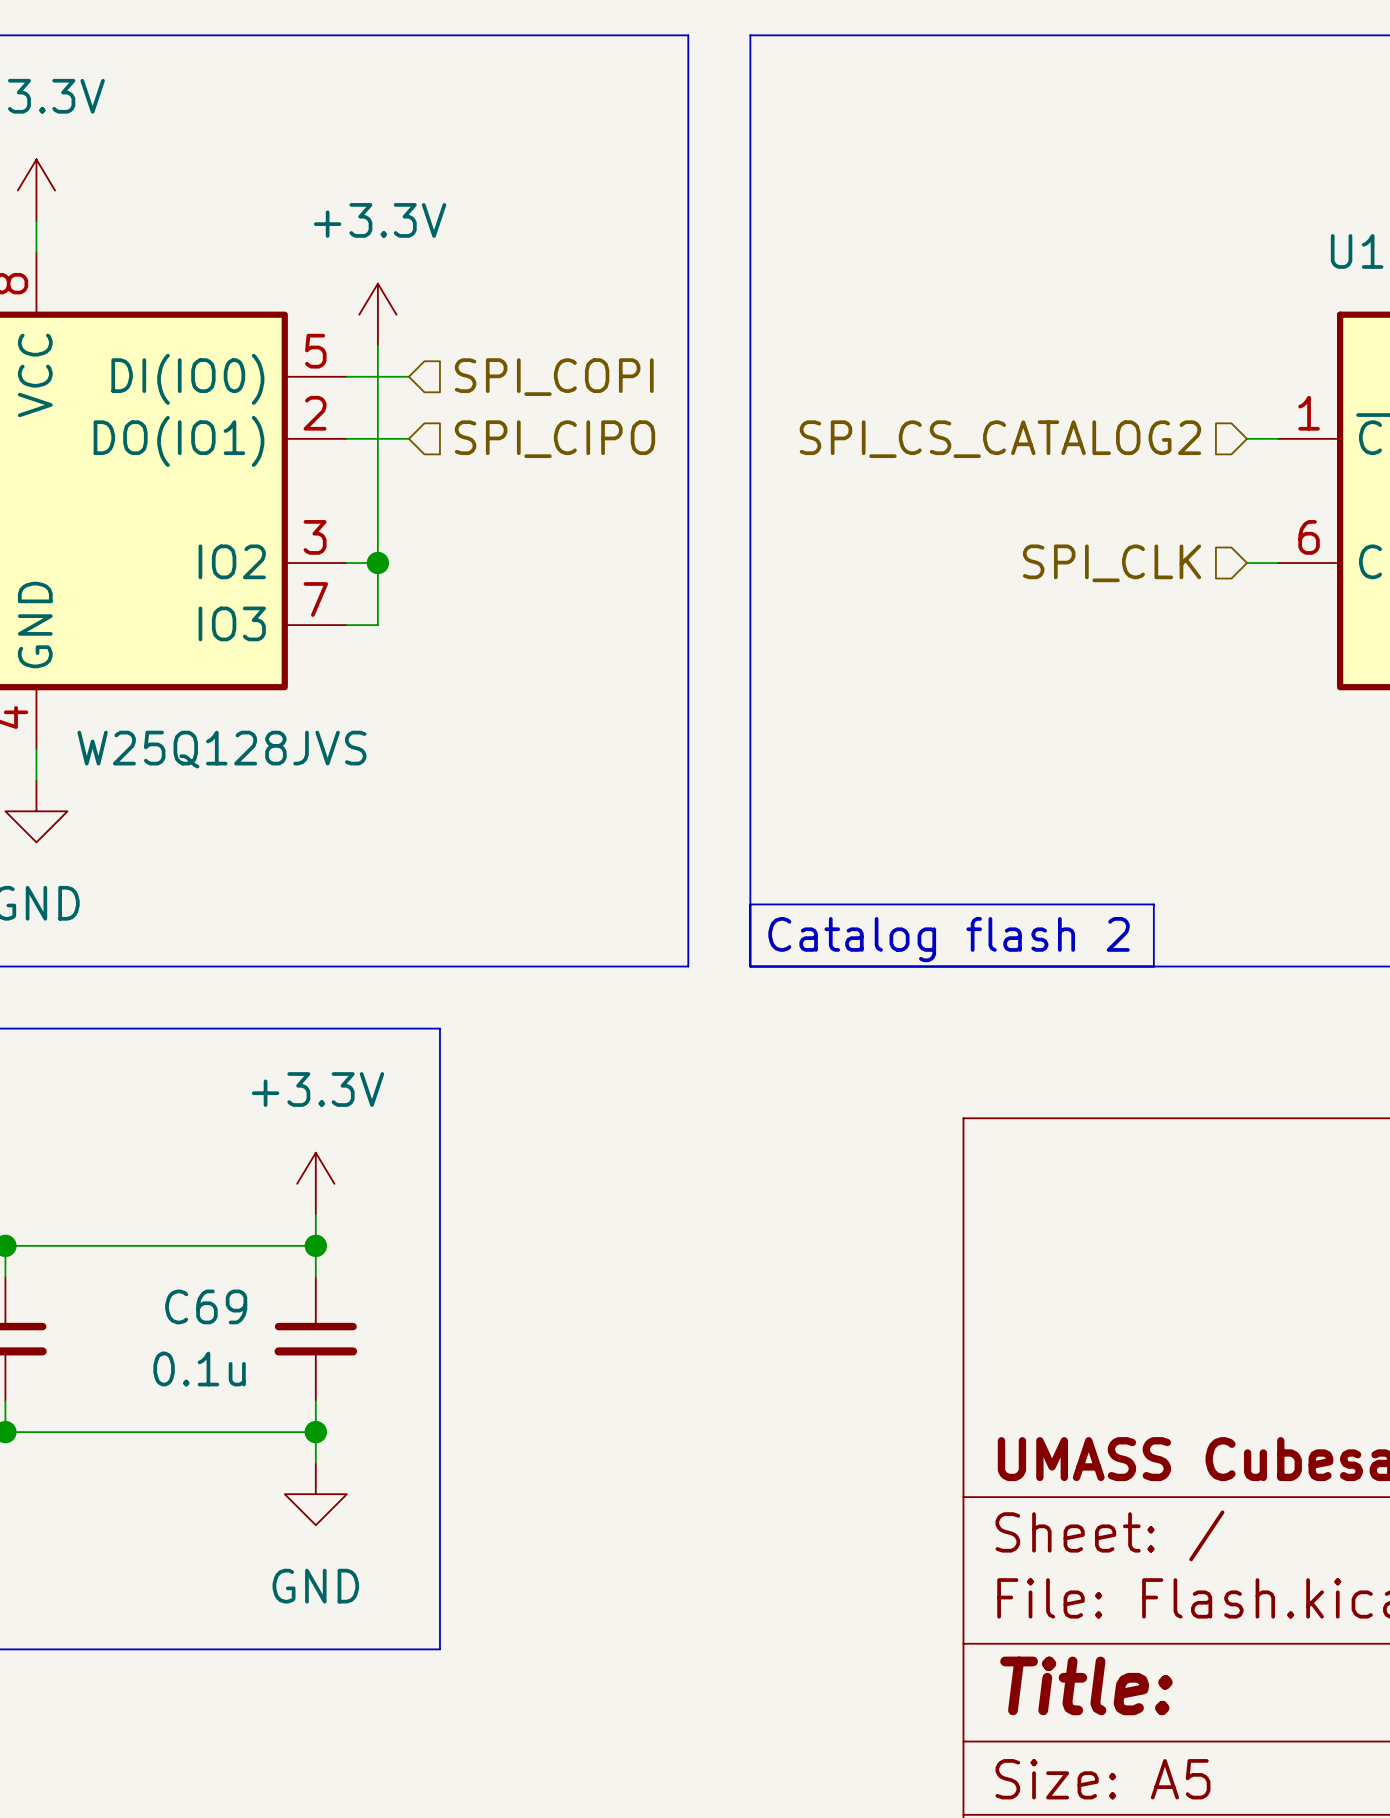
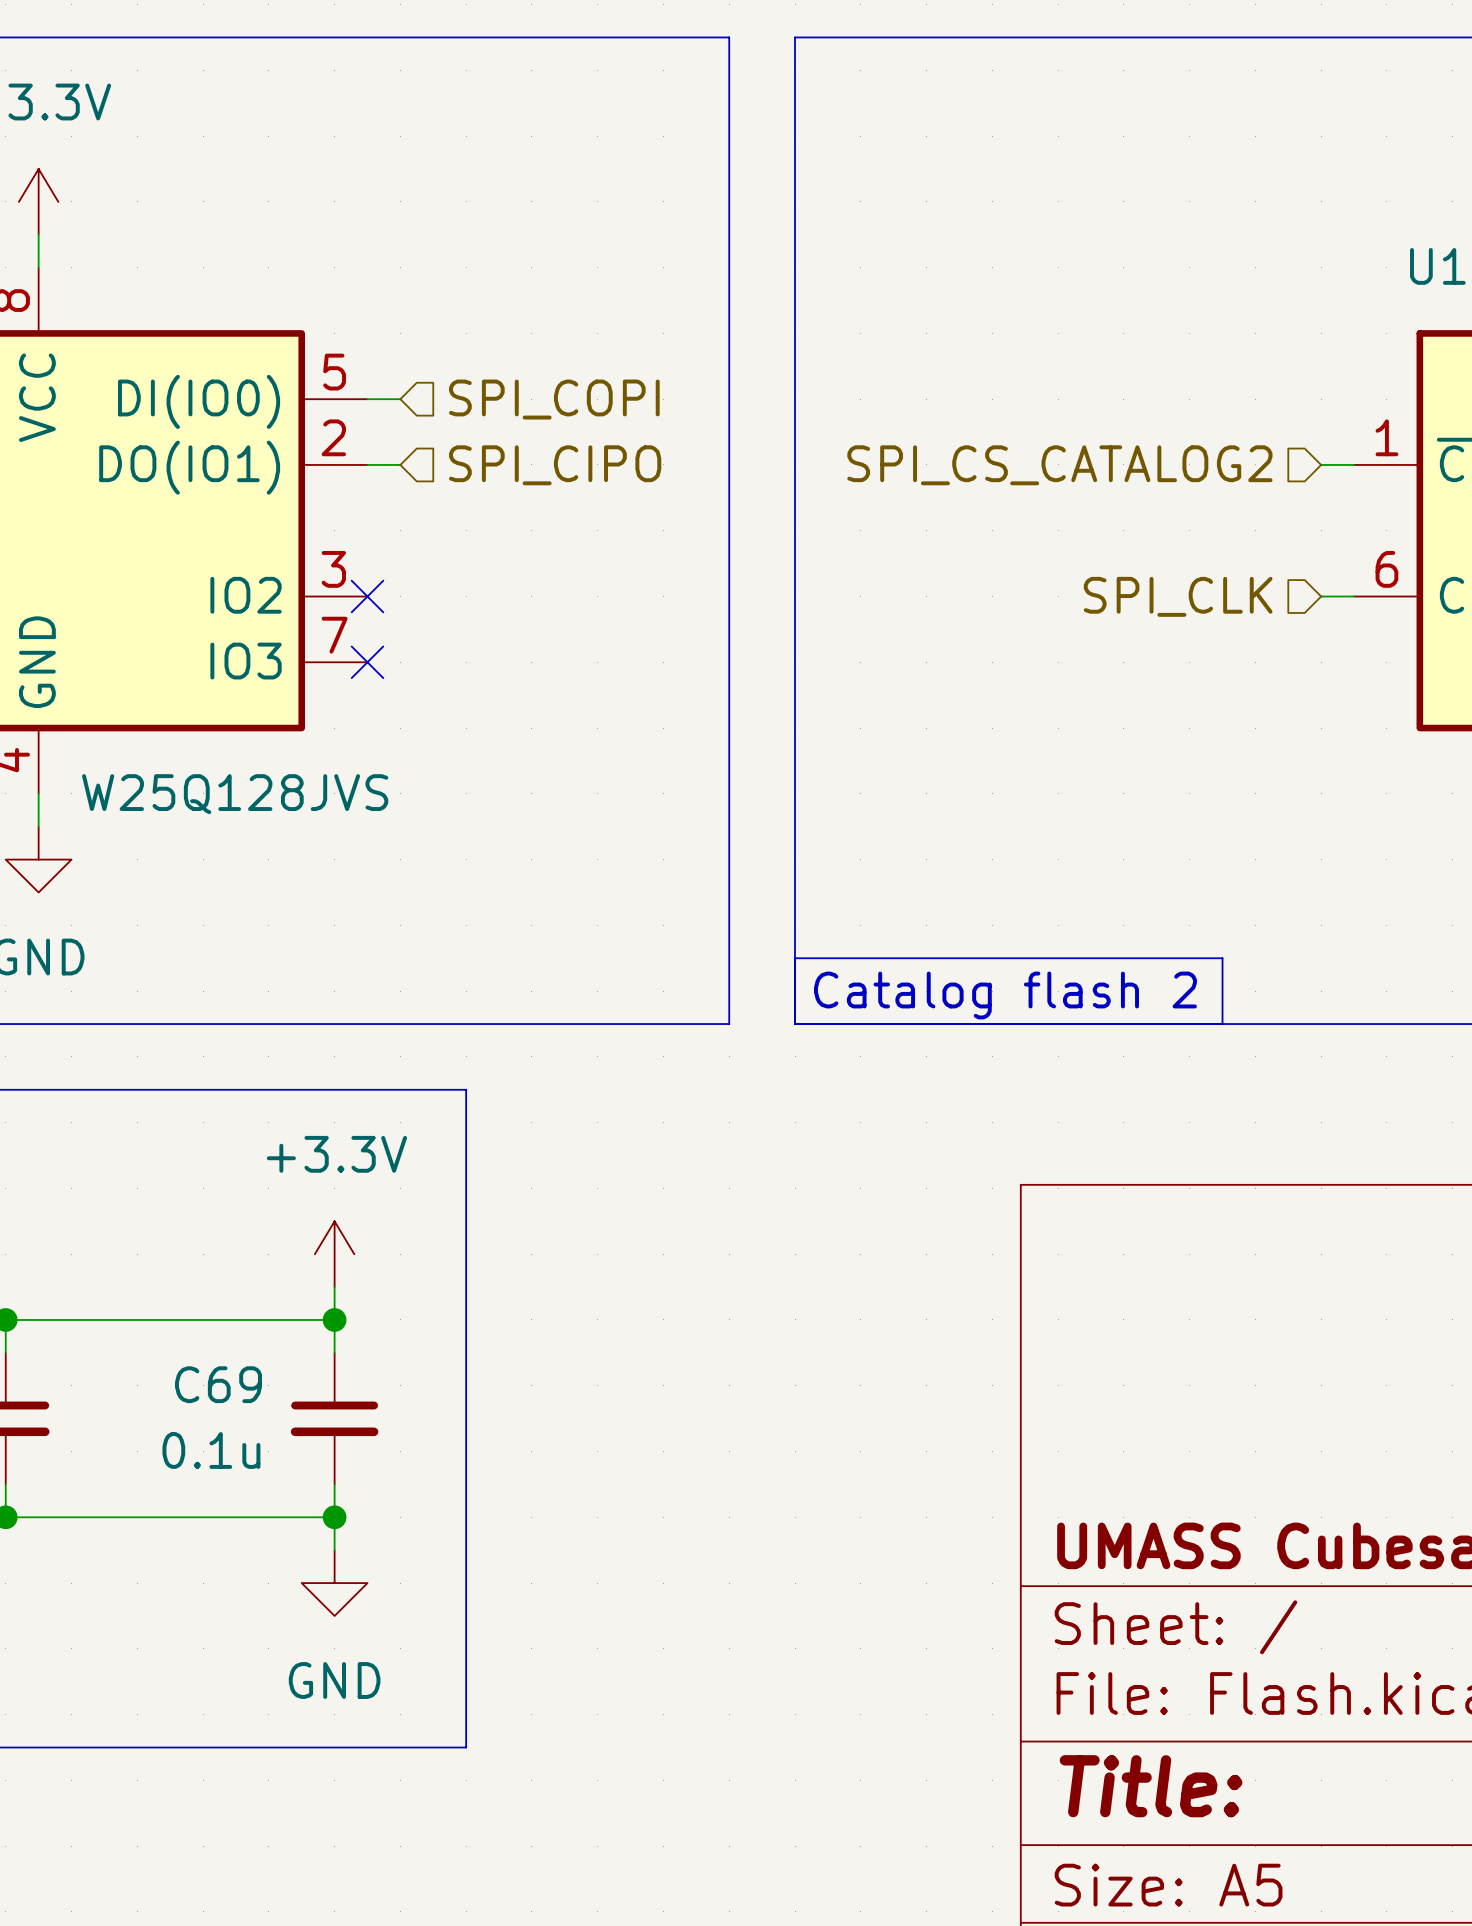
power symbol: +3.3V (377, 314) -> none
wire: (377, 345) (377, 625) (346, 625) -> none
wire: (377, 376) (408, 376) -> none
hierarchical label position: SPI_COPI (554, 377) -> SPI_COPI (554, 399)
wire: (377, 438) (408, 438) -> none
hierarchical label position: SPI_CIPO (555, 439) -> SPI_CIPO (555, 465)
wire: (346, 563) (377, 563) -> none
no-connect mark: none -> (367, 596)
junction: (377, 563) -> none
no-connect mark: none -> (367, 662)

